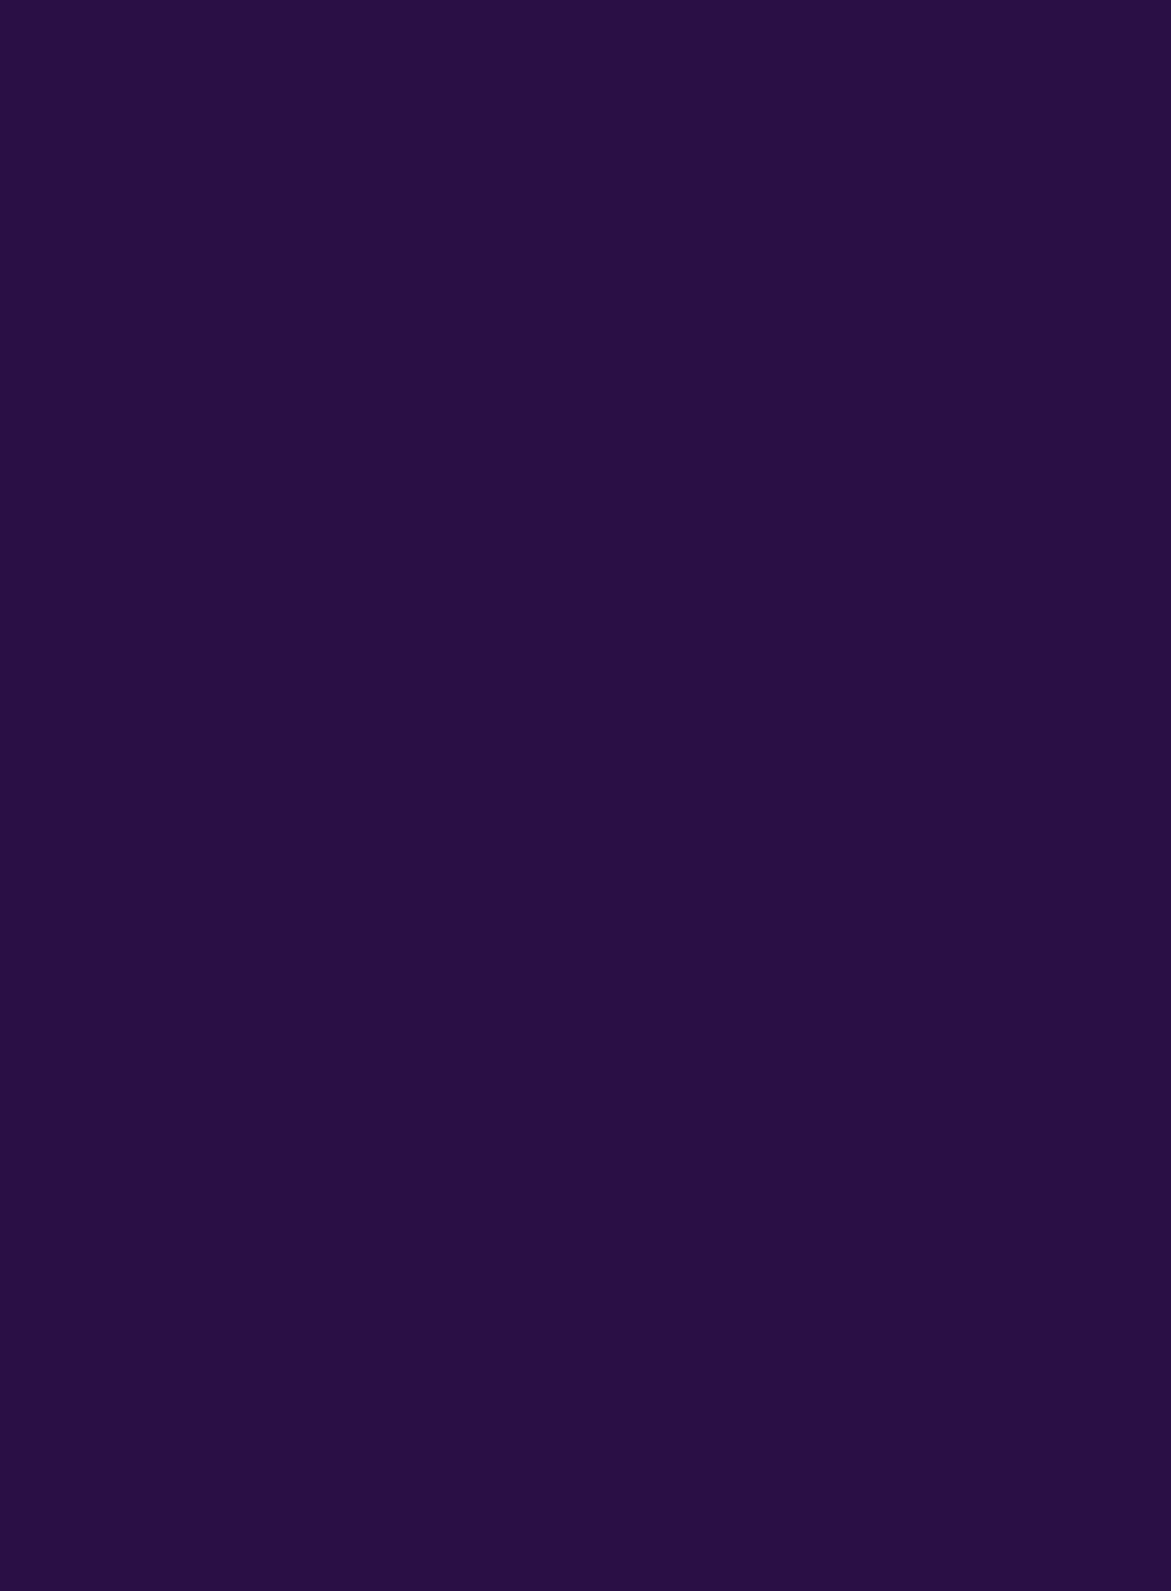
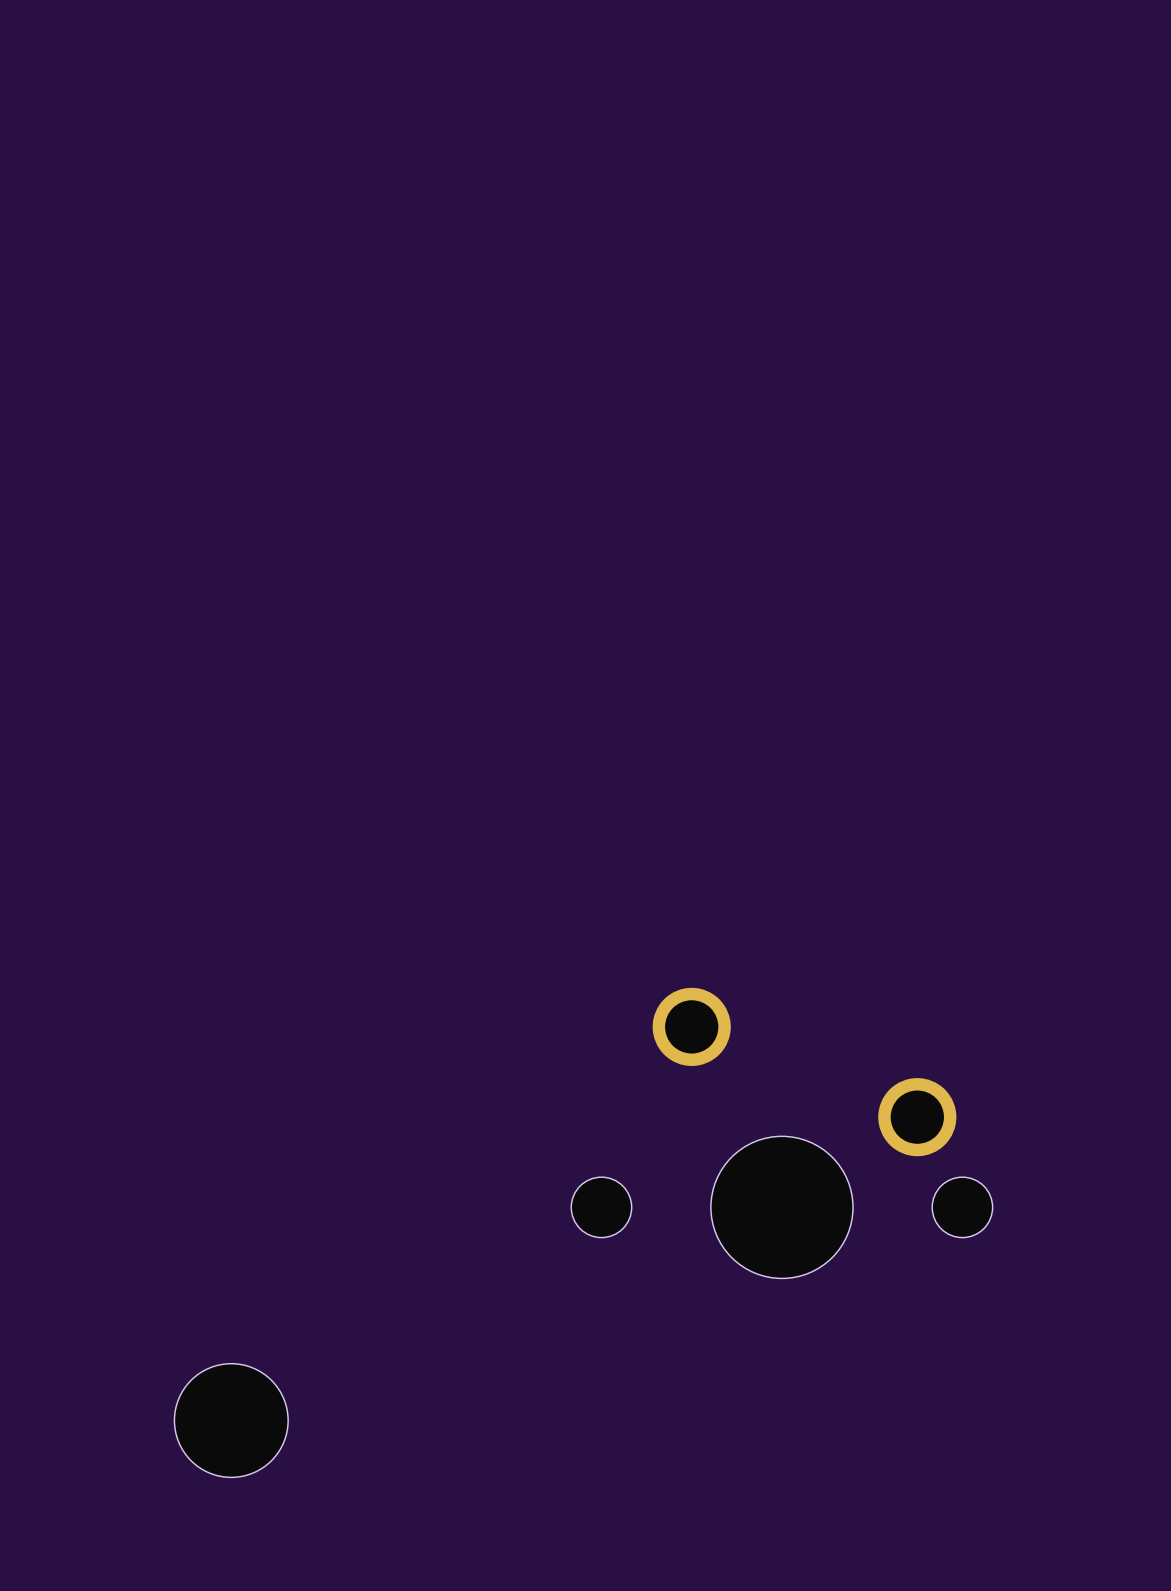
part: none -> (781, 1133)
part: none -> (231, 1420)

